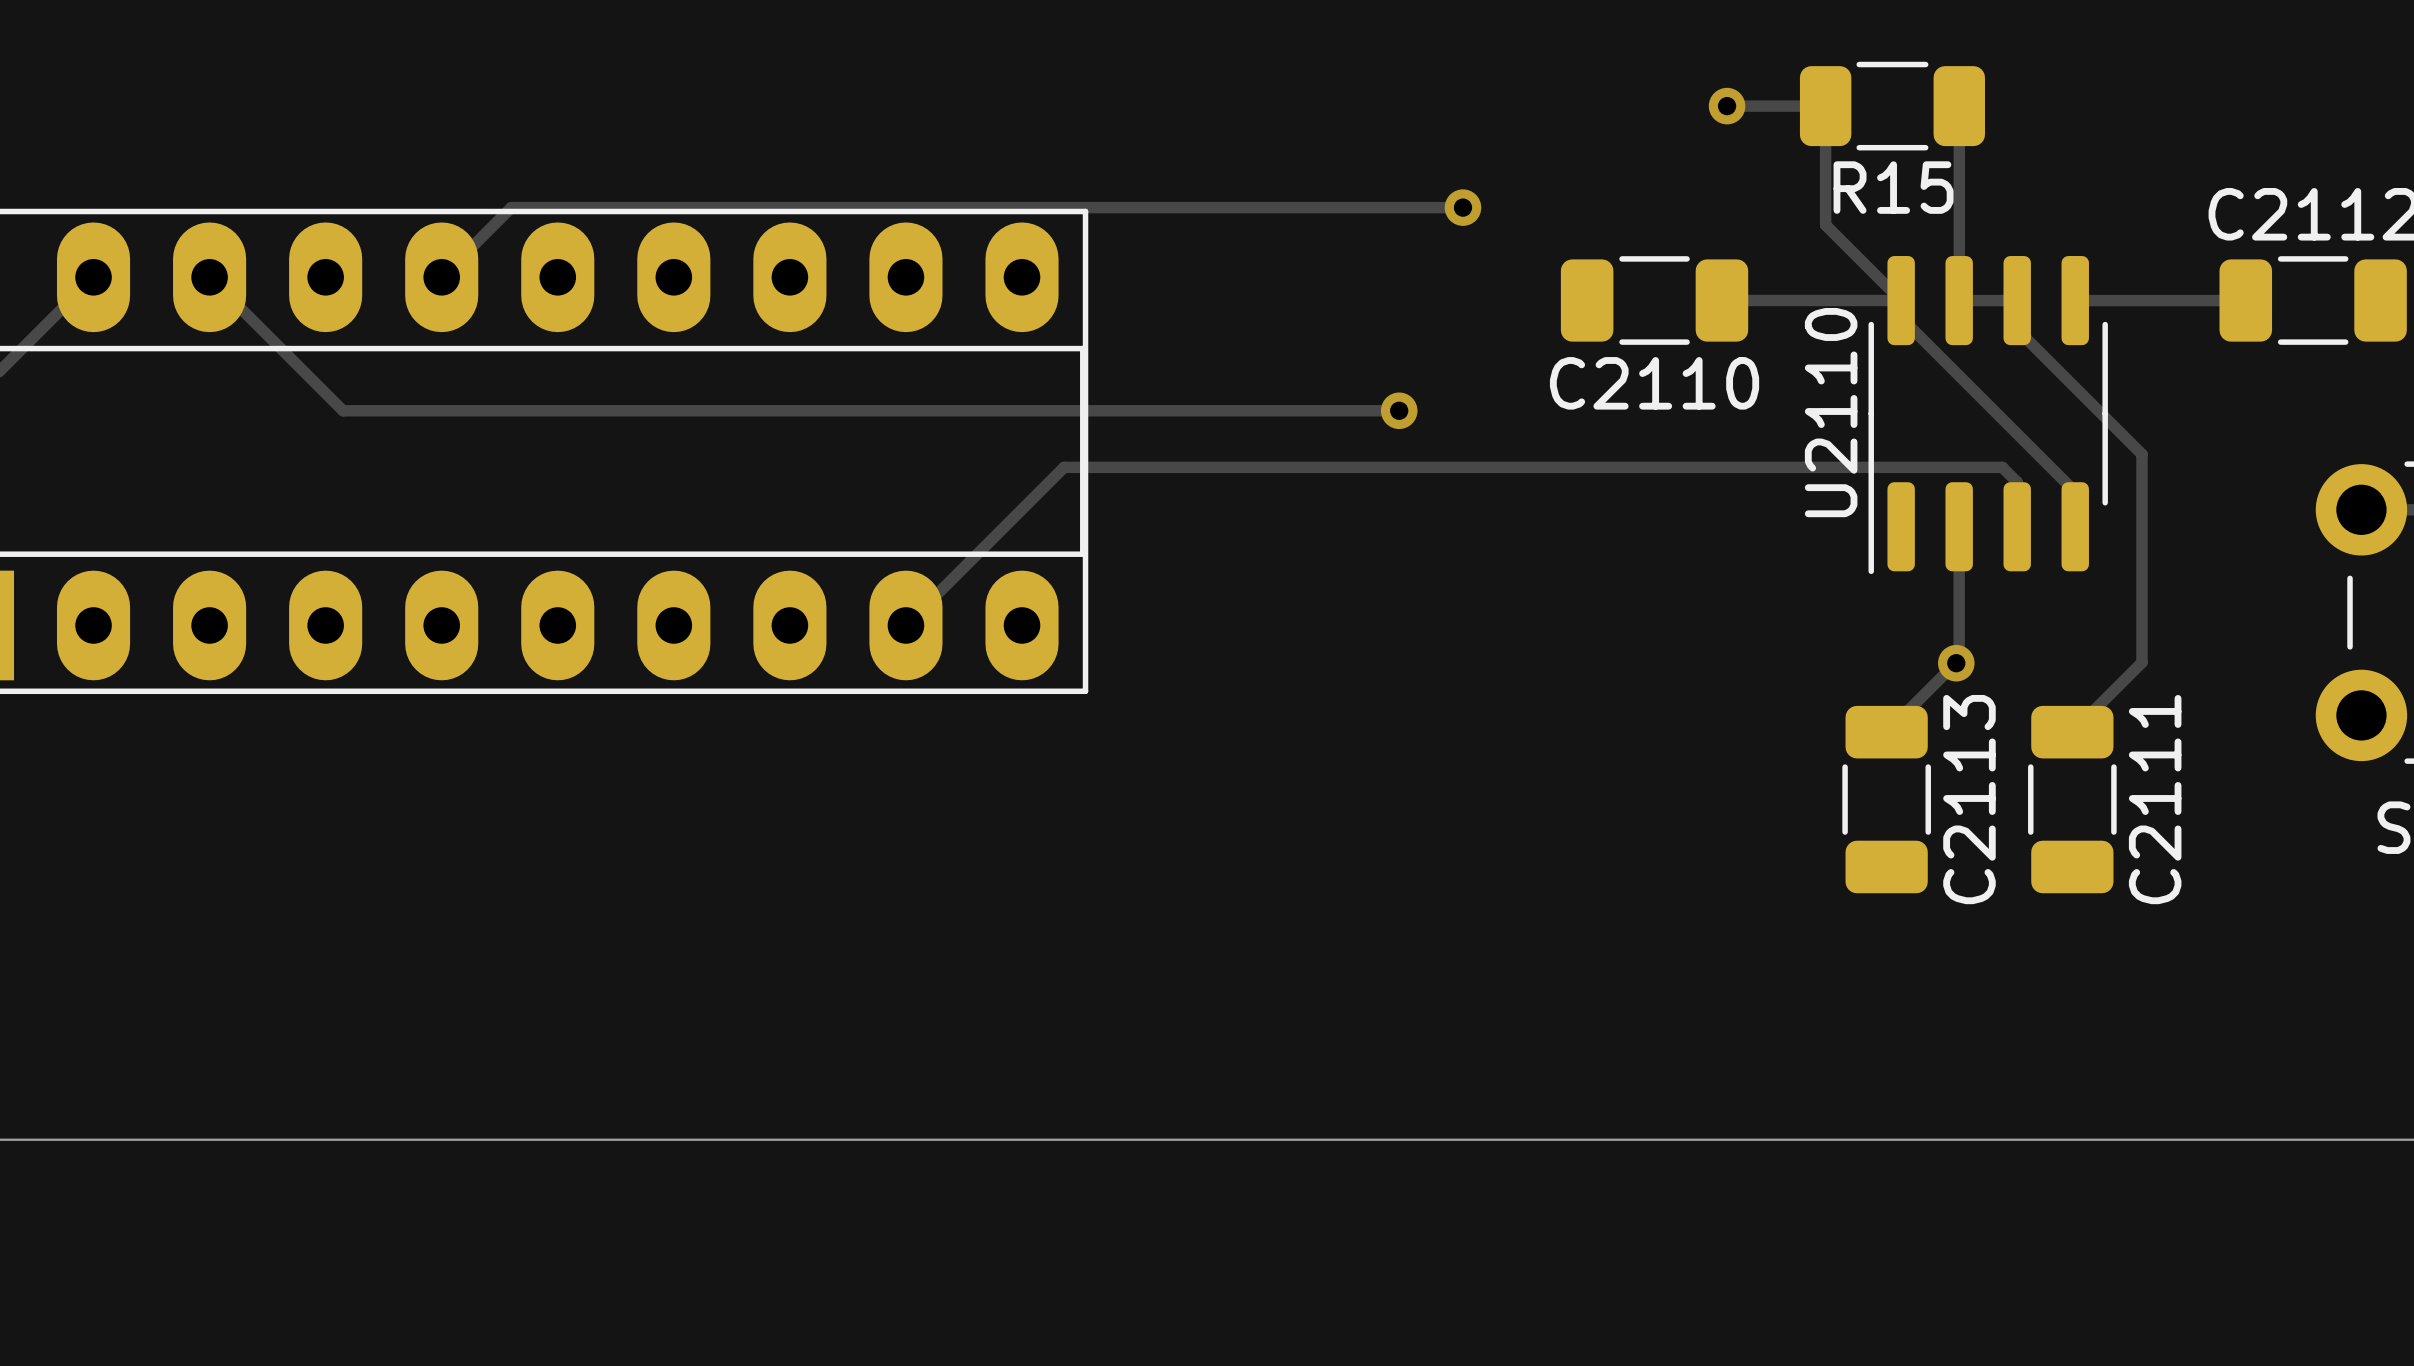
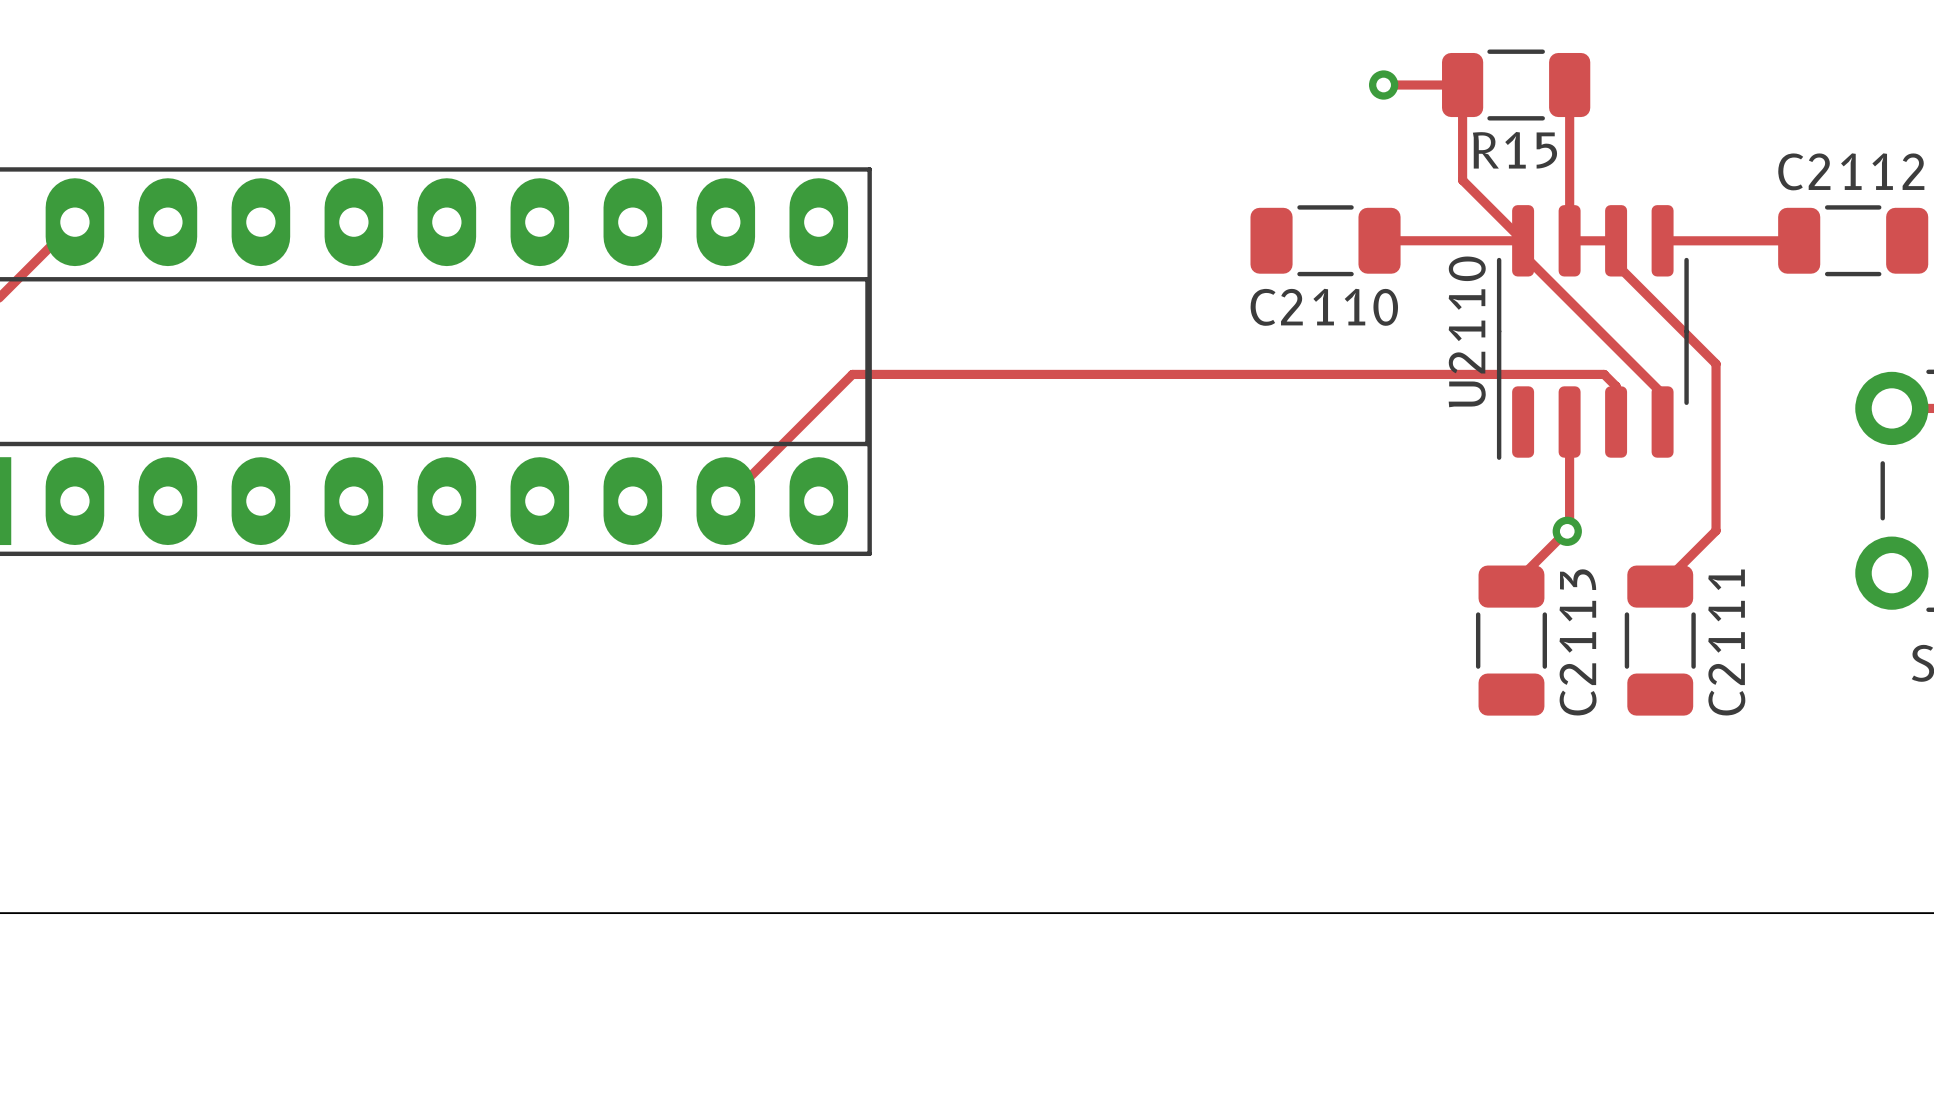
track: (1462, 207) (511, 207) (441, 277) -> none
via: (1462, 207) -> none
track: (209, 277) (343, 410) (1399, 410) -> none
via: (1399, 410) -> none

